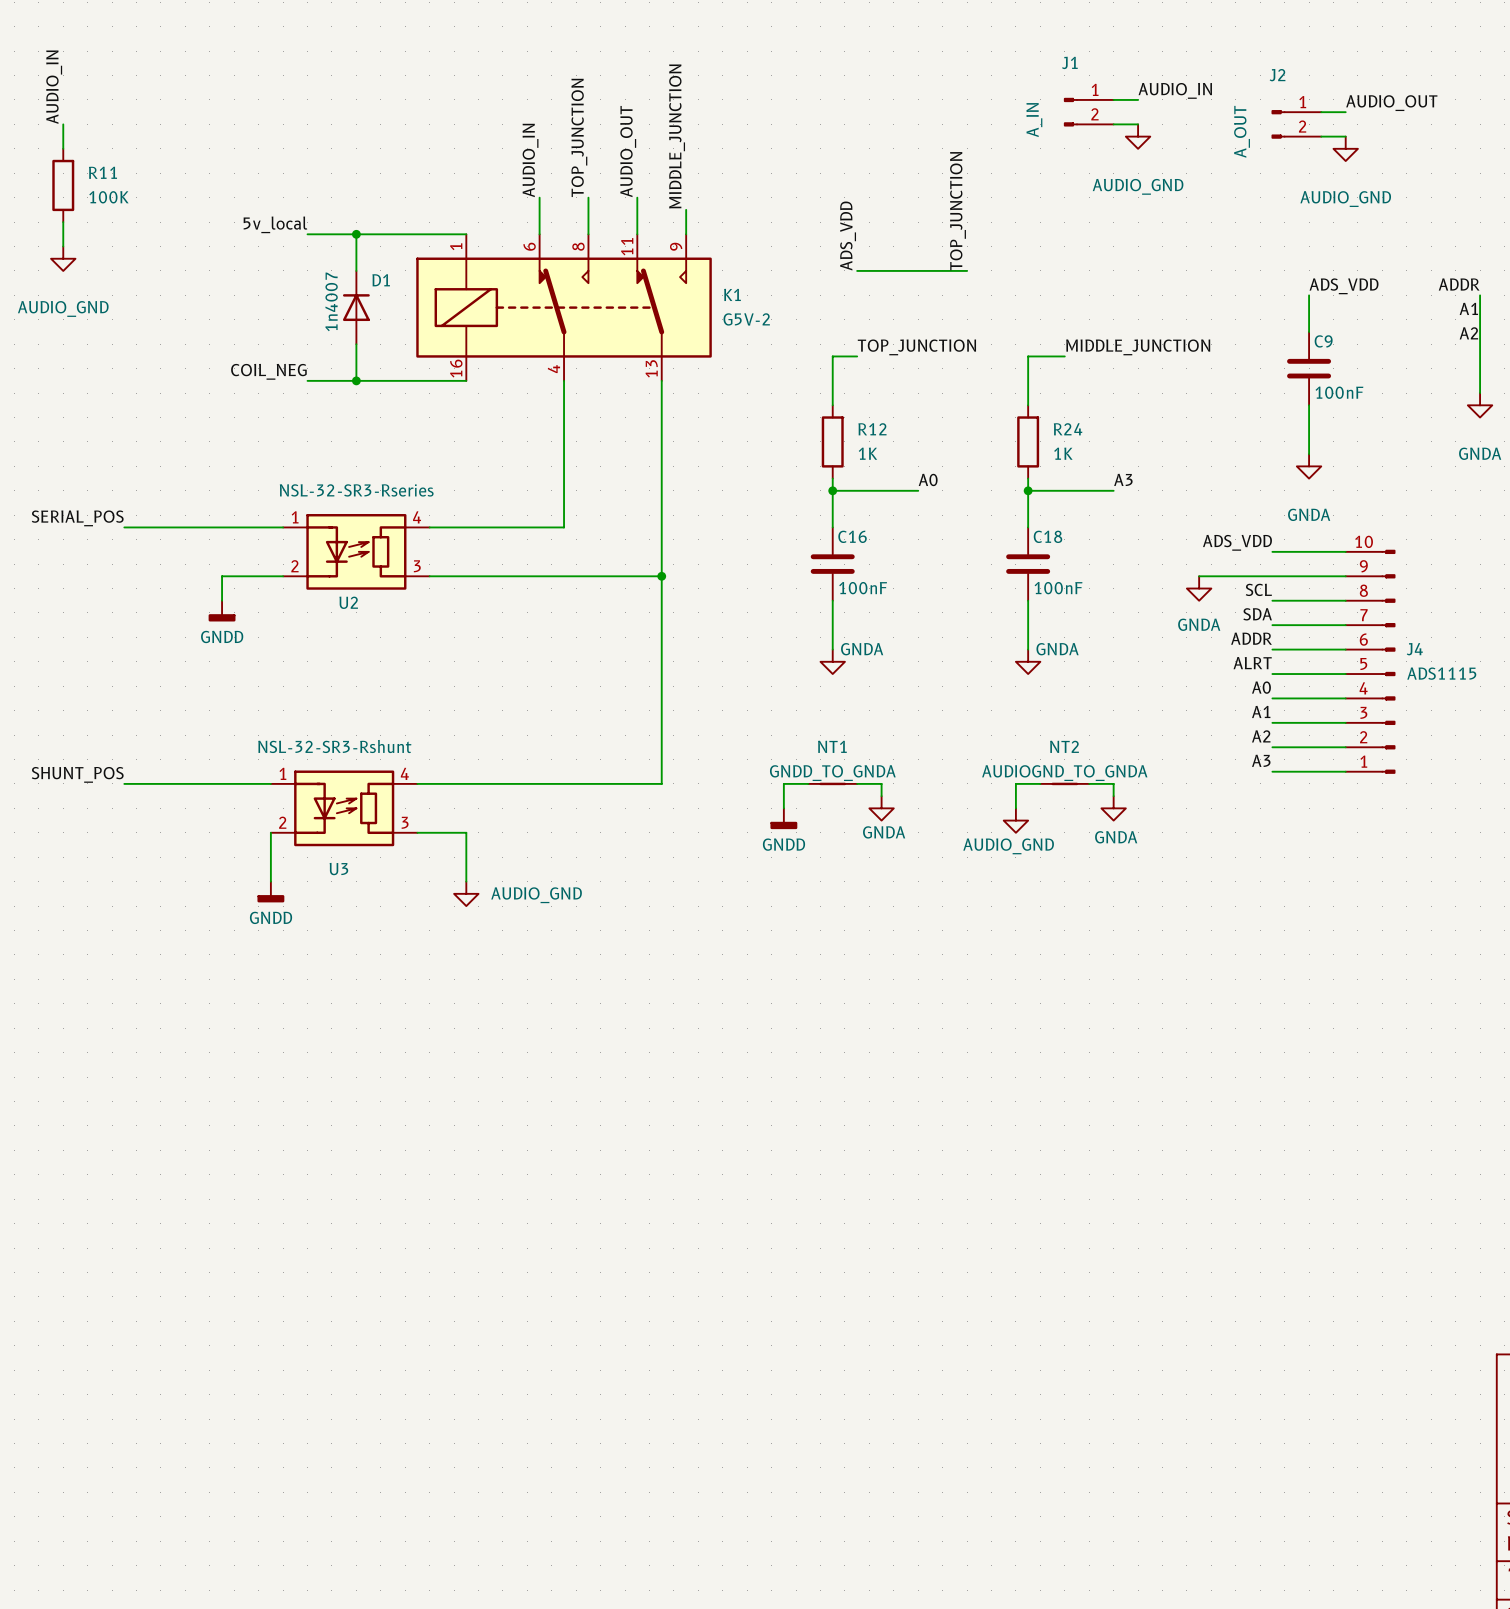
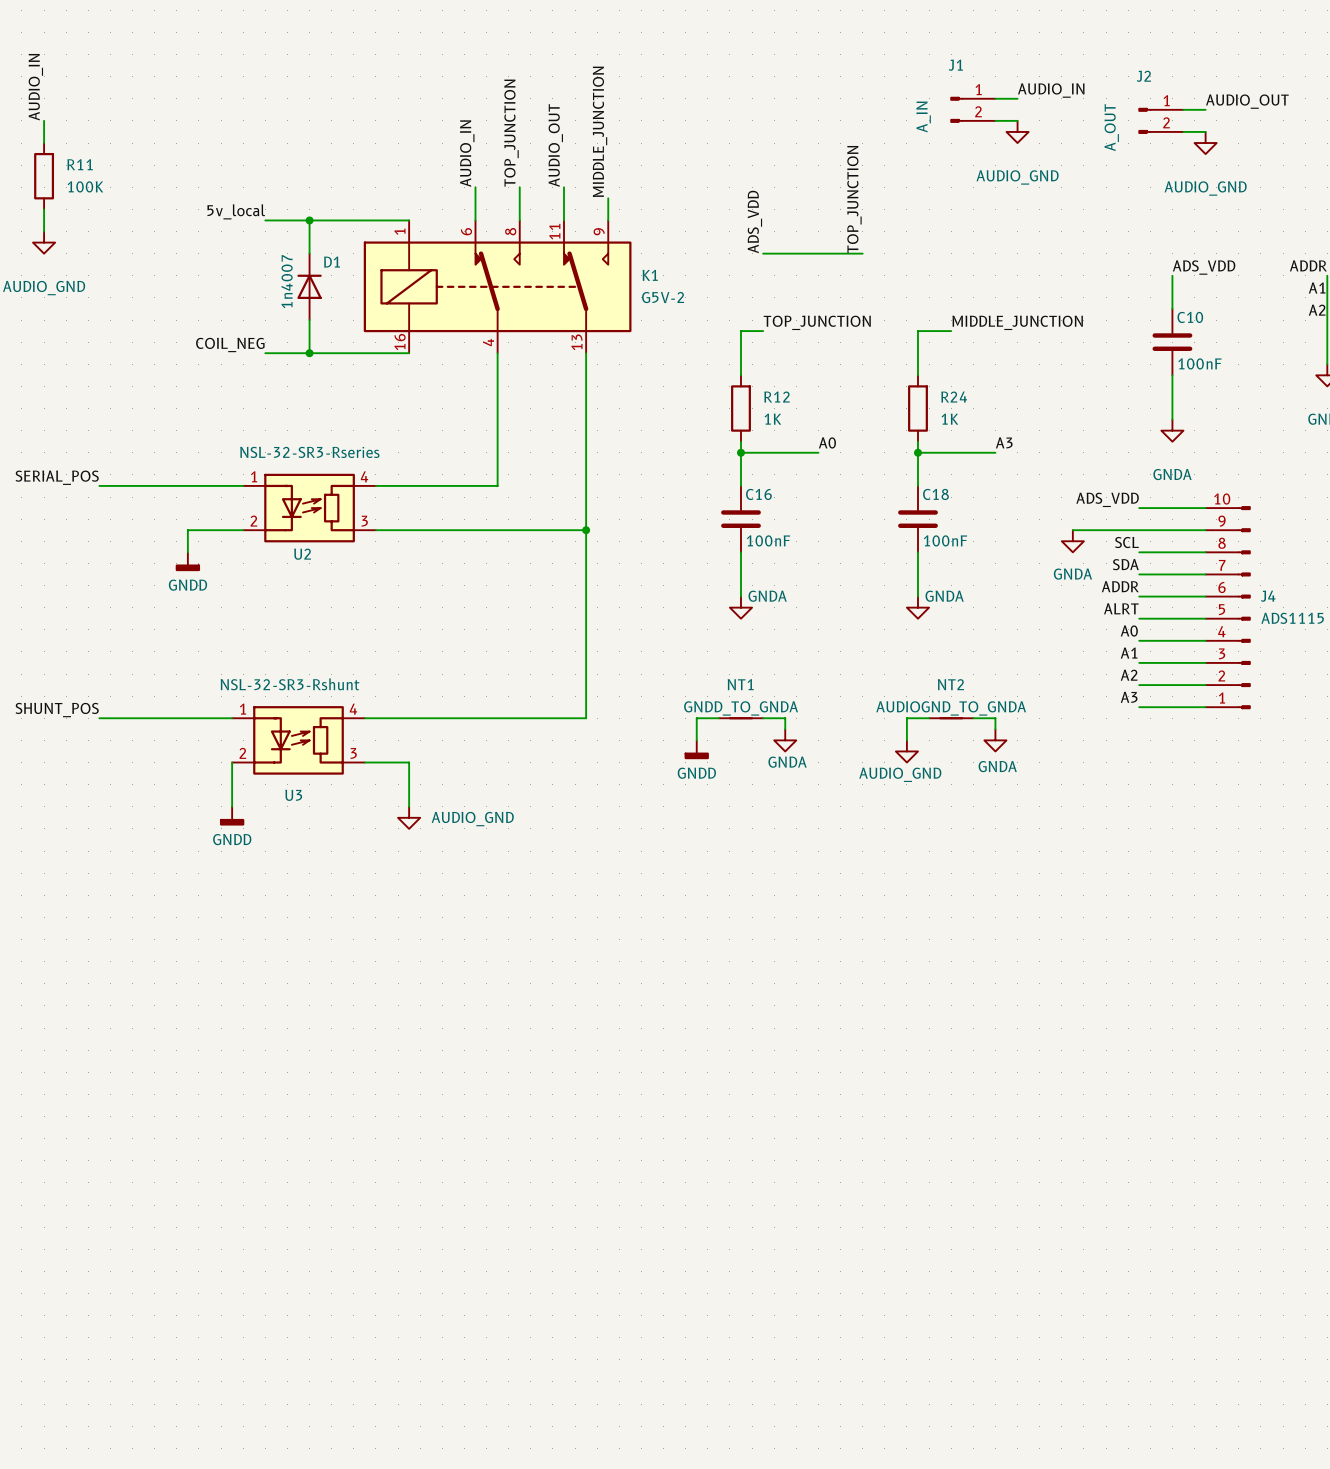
C9 name: C9 (1323, 341) -> C10 (1190, 317)

